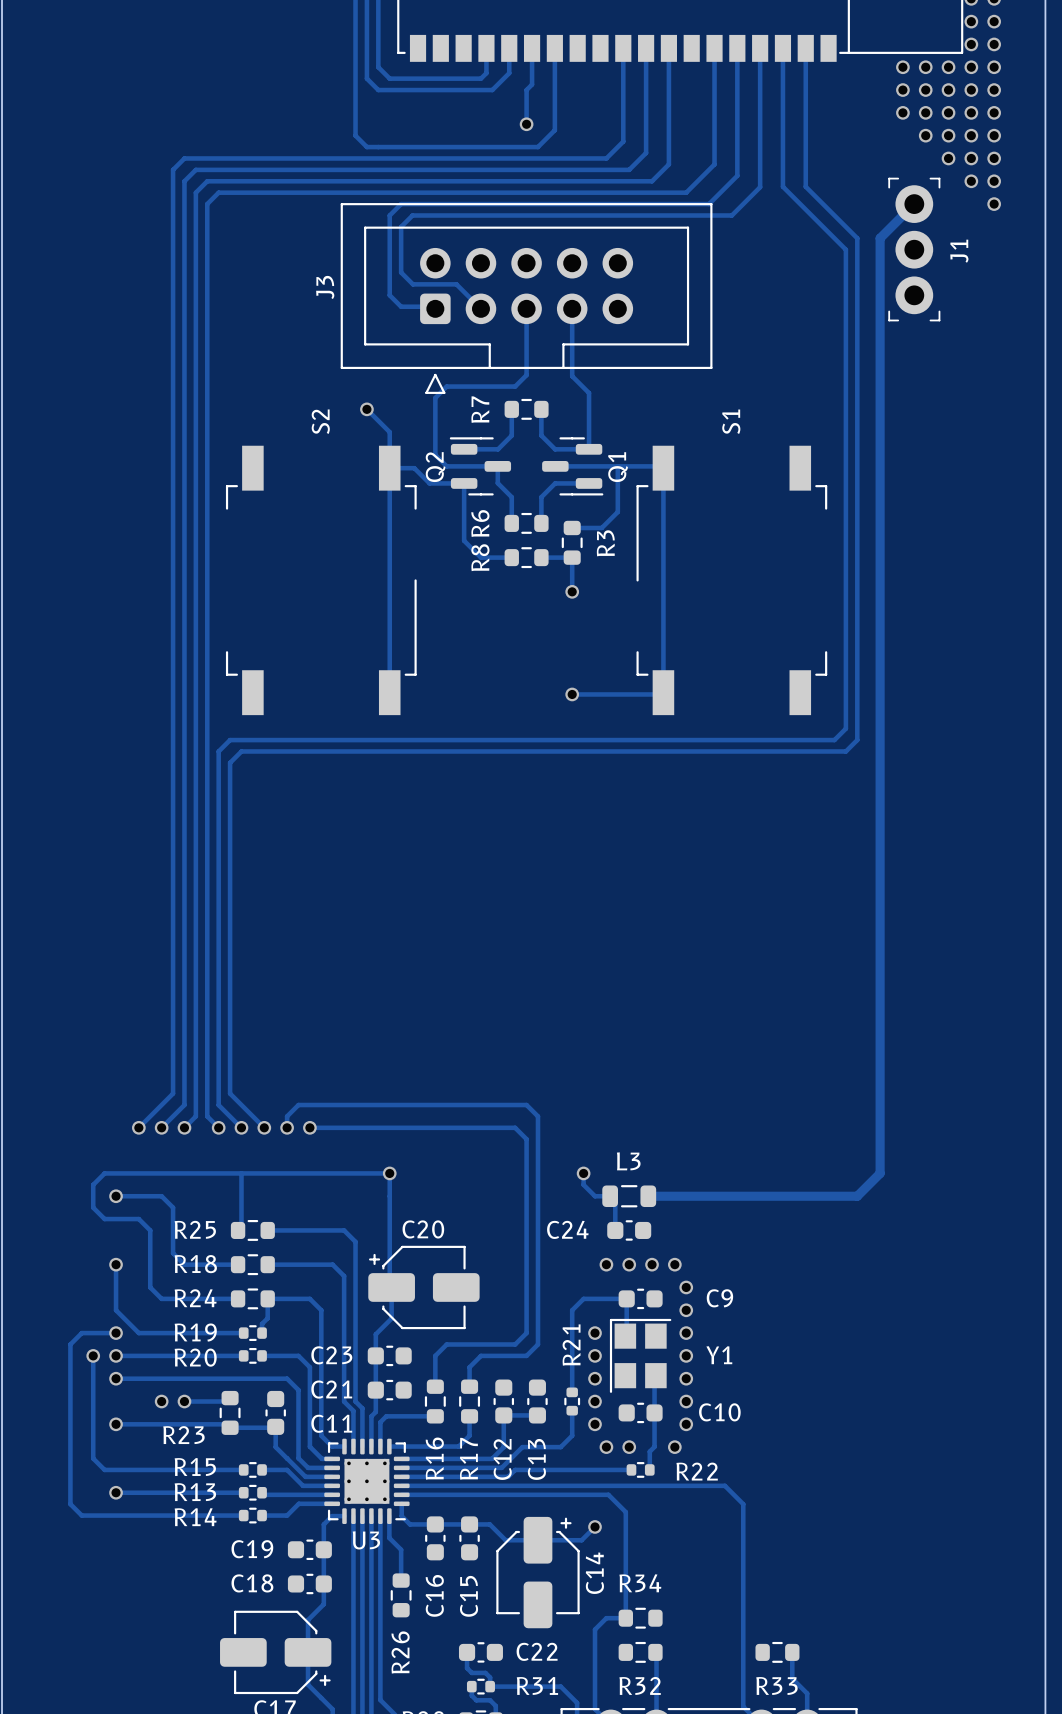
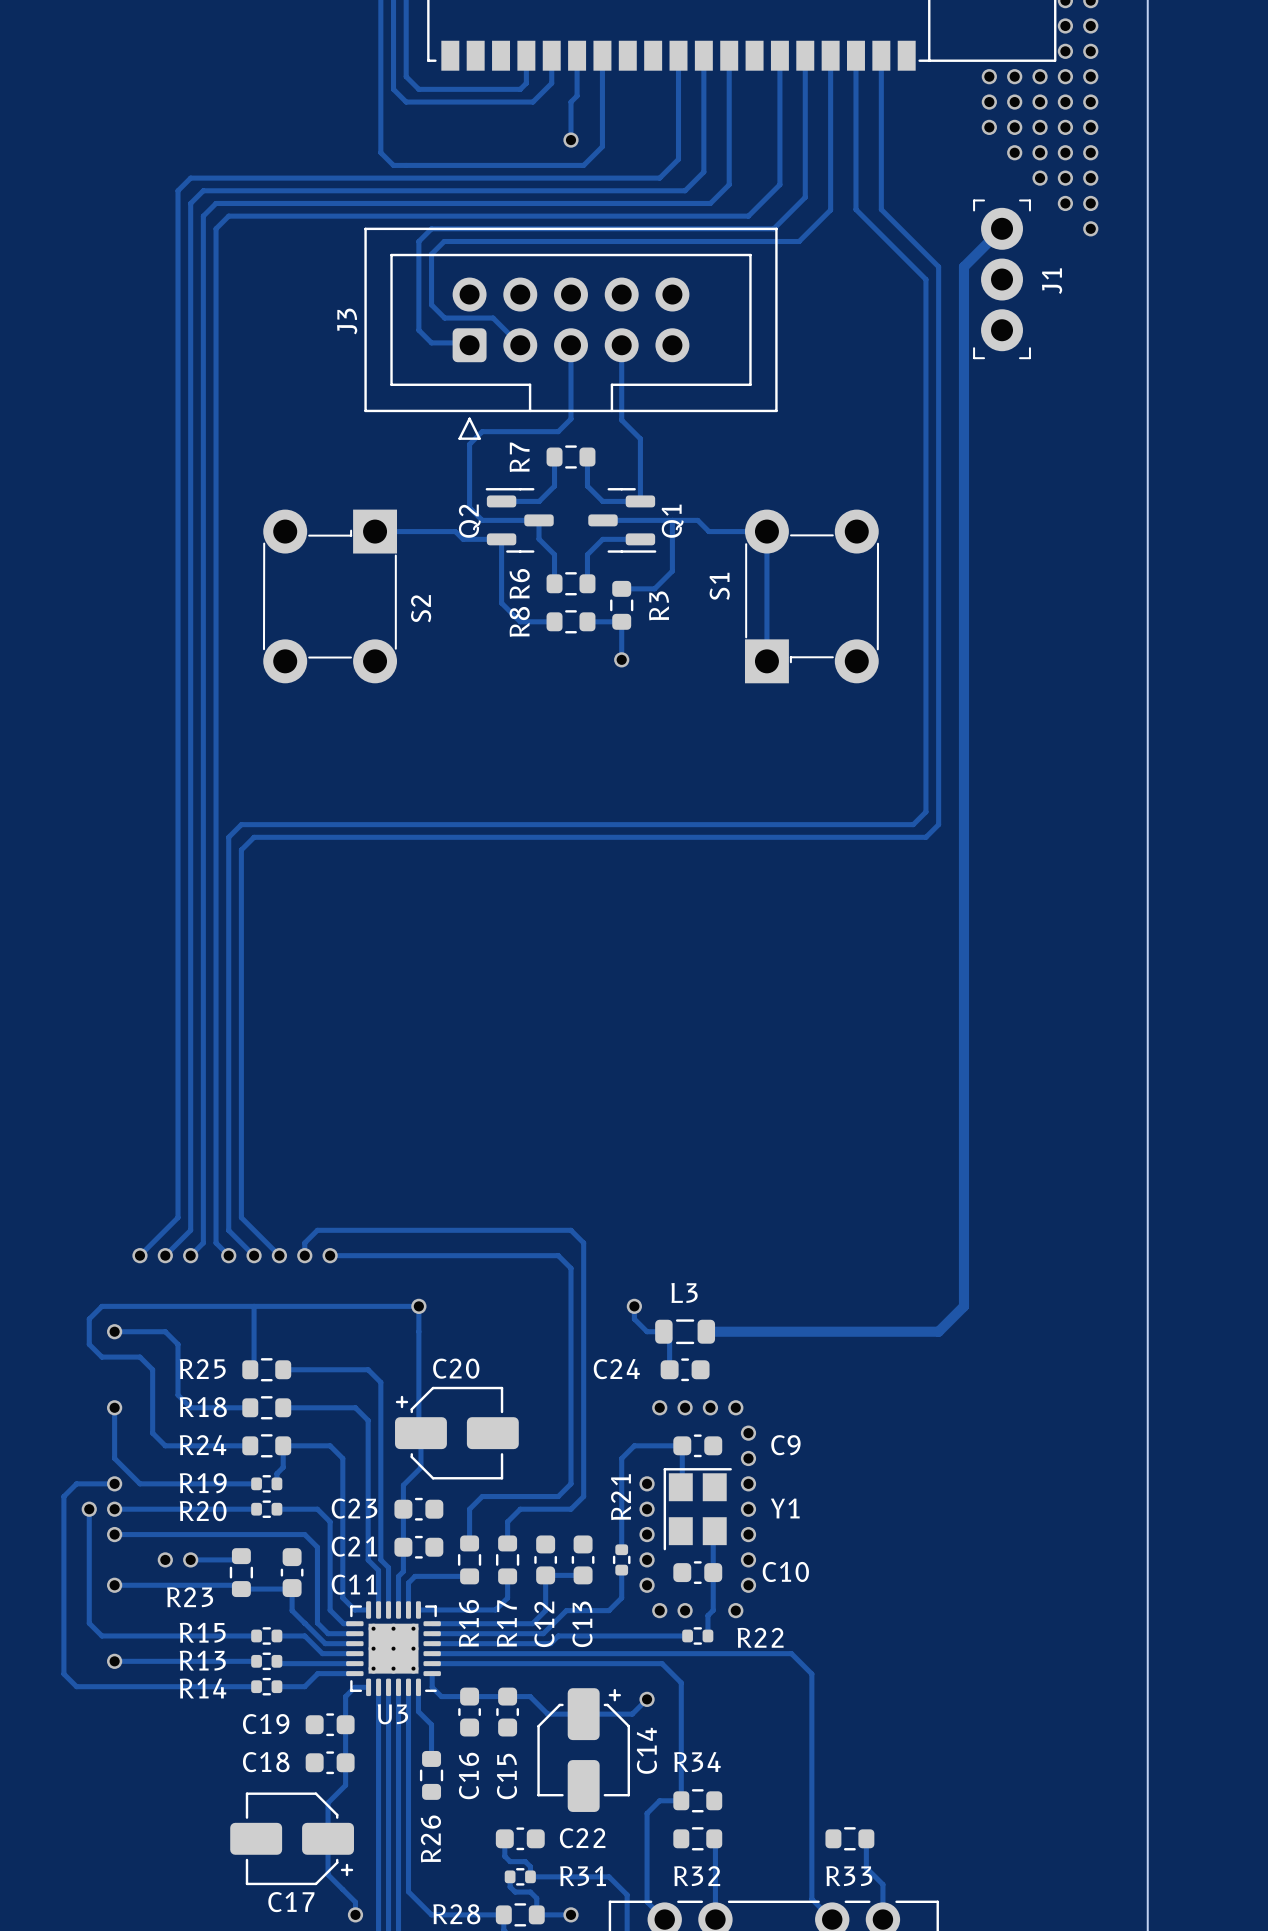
track: (366, 409) (389, 432) (389, 692) -> none
via: (366, 409) -> none
S2 name position: S2 (320, 421) -> S2 (421, 608)
S1 name position: S1 (731, 421) -> S1 (719, 586)
S2 footprint: [225, 445, 417, 716] -> [263, 509, 398, 684]
S1 footprint: [636, 445, 828, 716] -> [744, 509, 879, 684]
track: (640, 466) (661, 466) (663, 468) (663, 692) (661, 694) (572, 694) -> (697, 520) (708, 531) (766, 531) (766, 661)
track: (389, 468) (414, 468) (422, 476) -> (375, 531) (455, 531)
via: (572, 694) -> none

